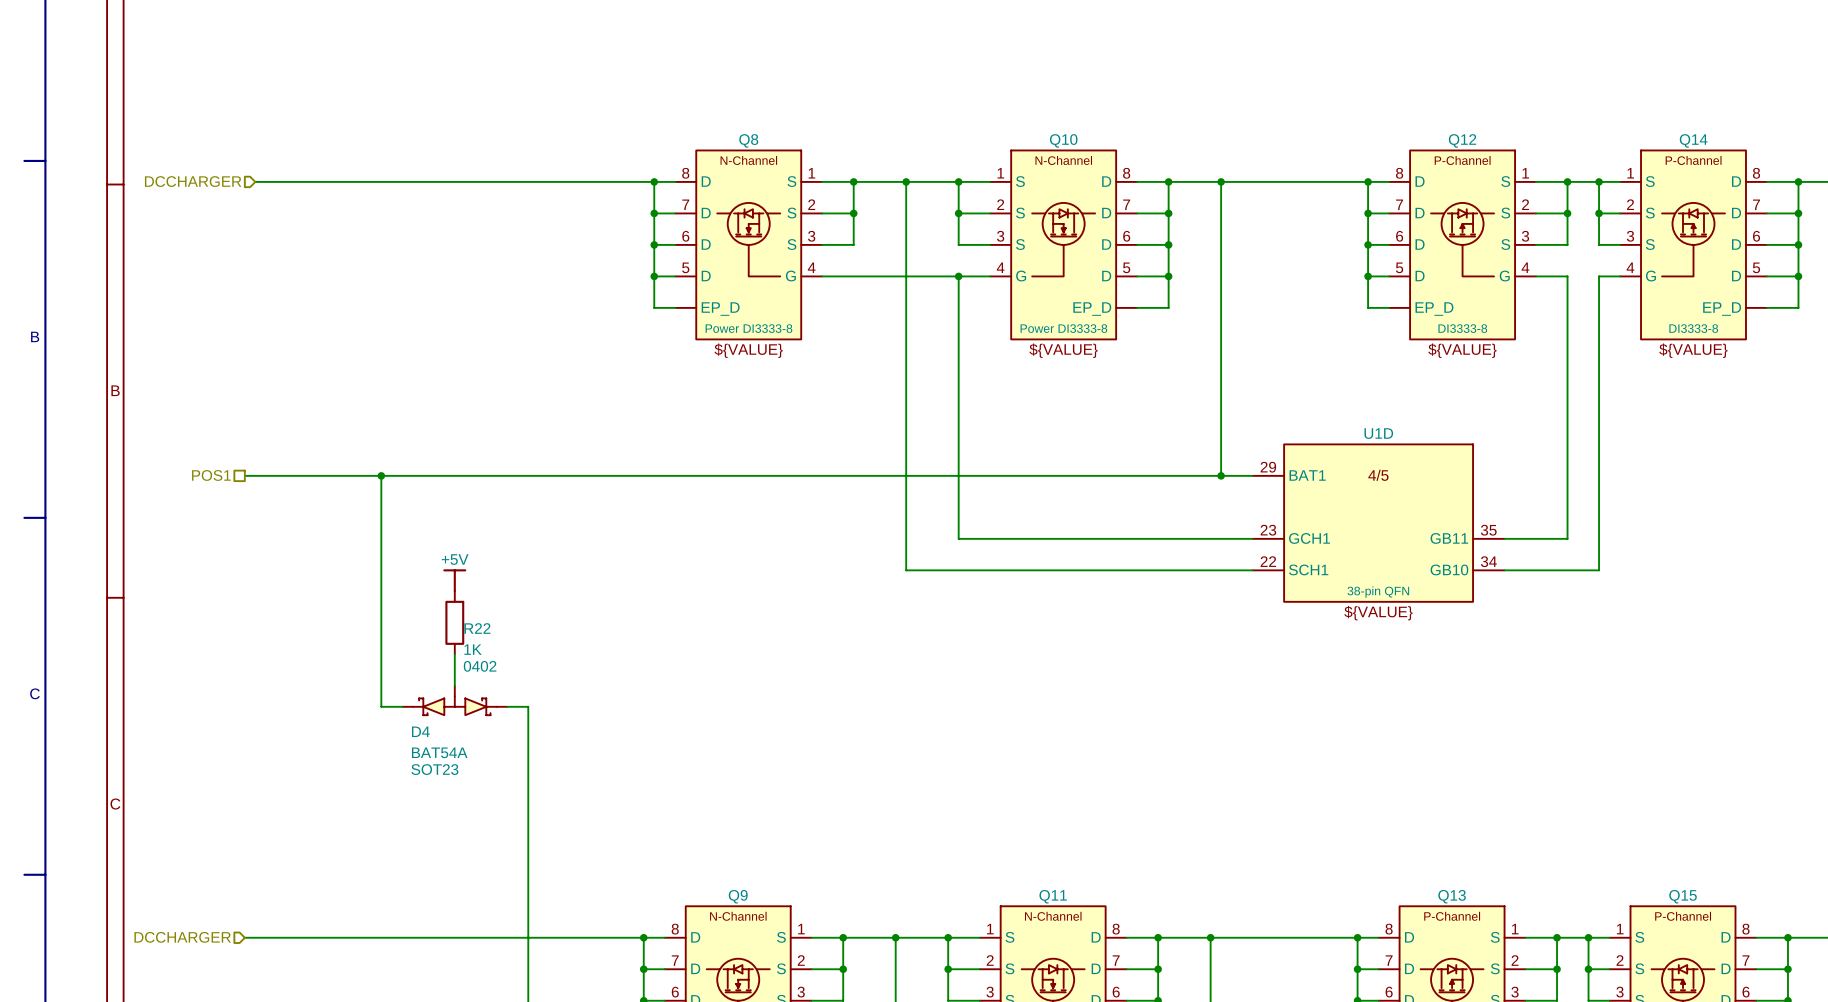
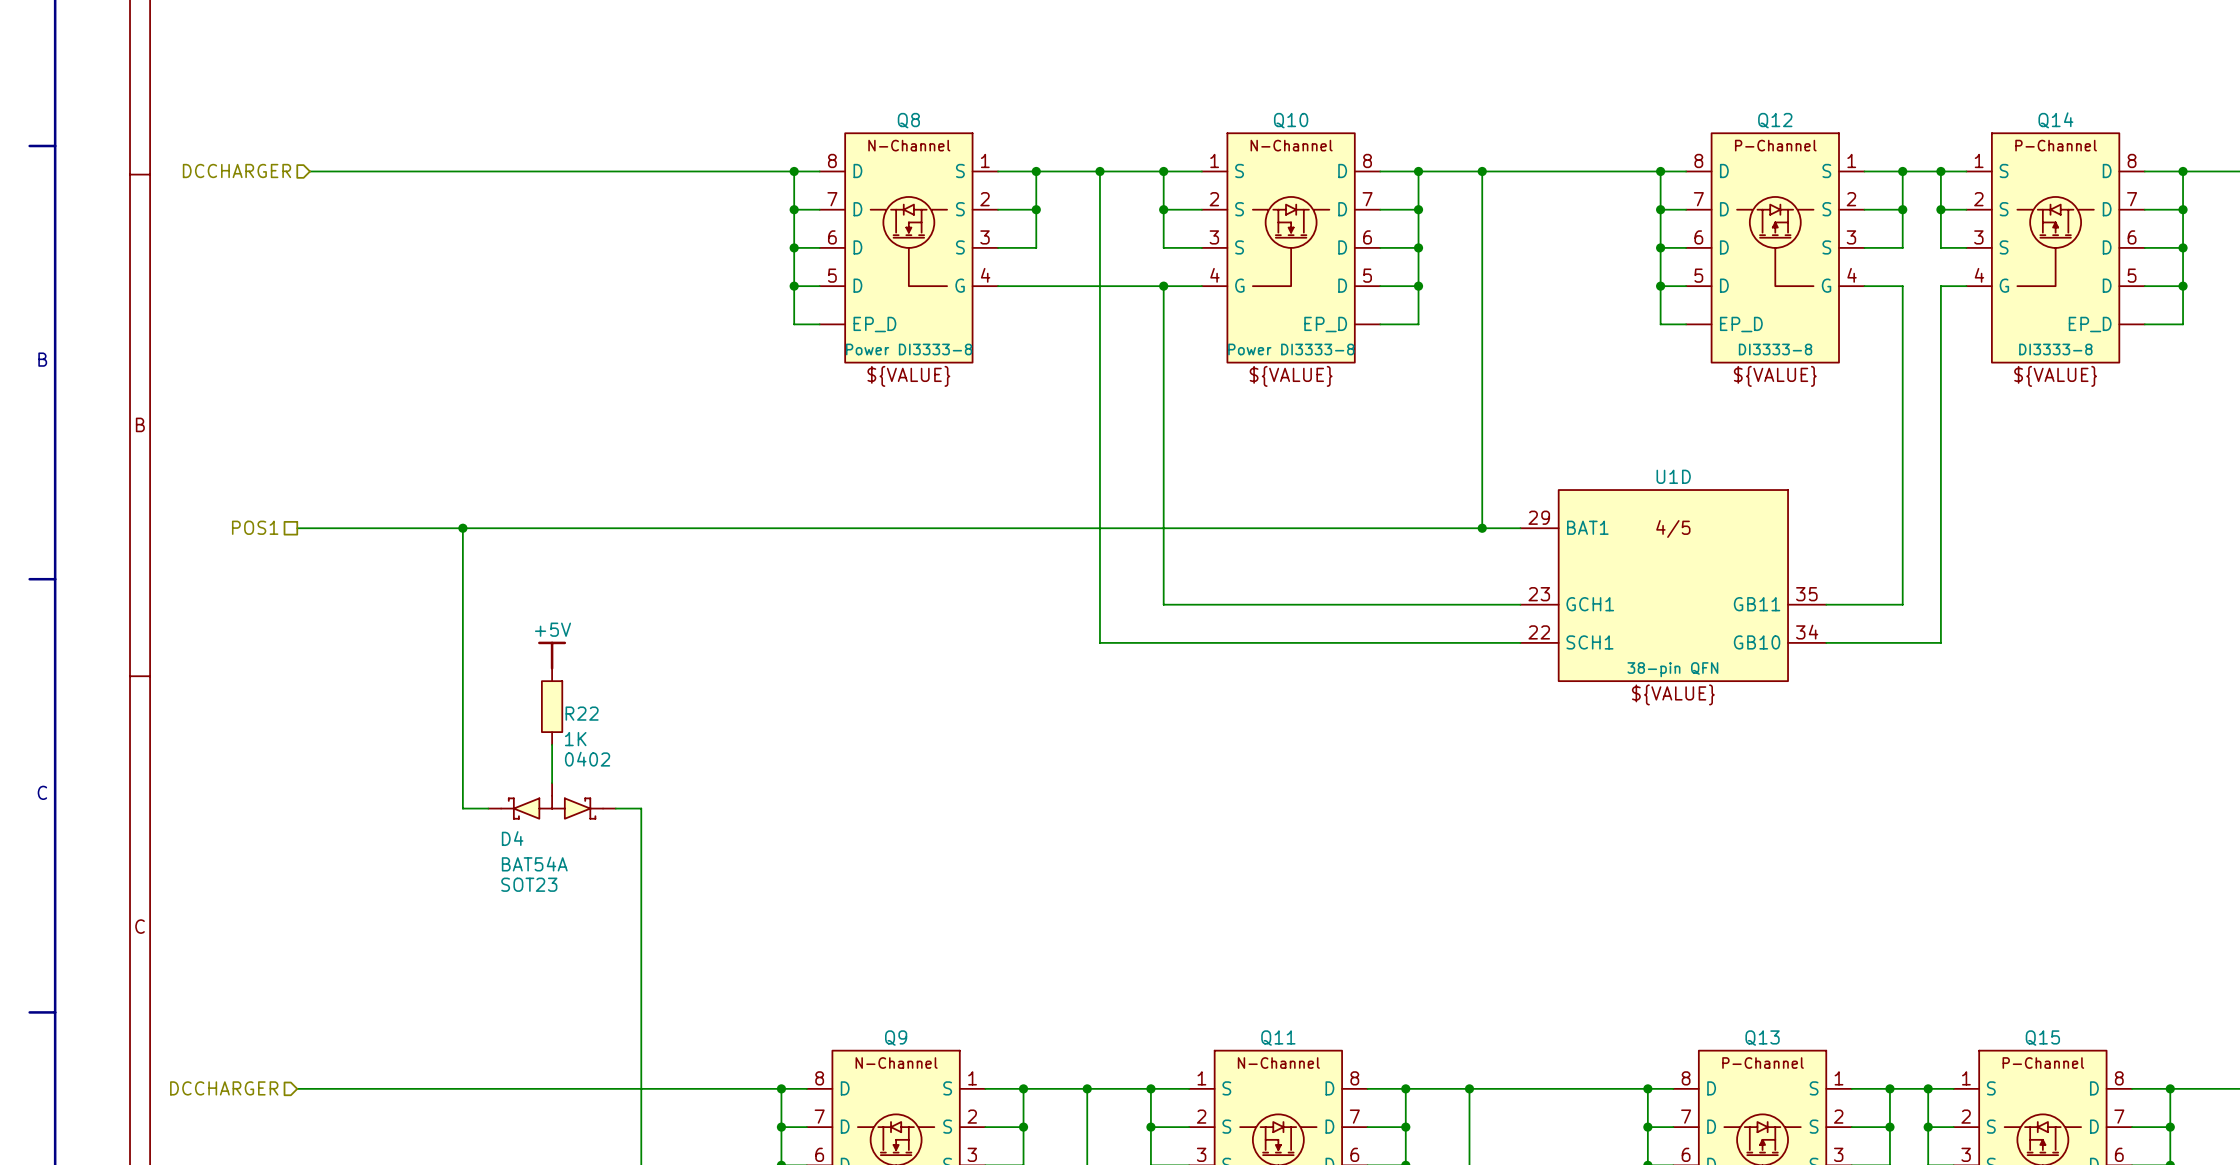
R22 symbol: [445, 591, 465, 655] -> [541, 668, 563, 745]

